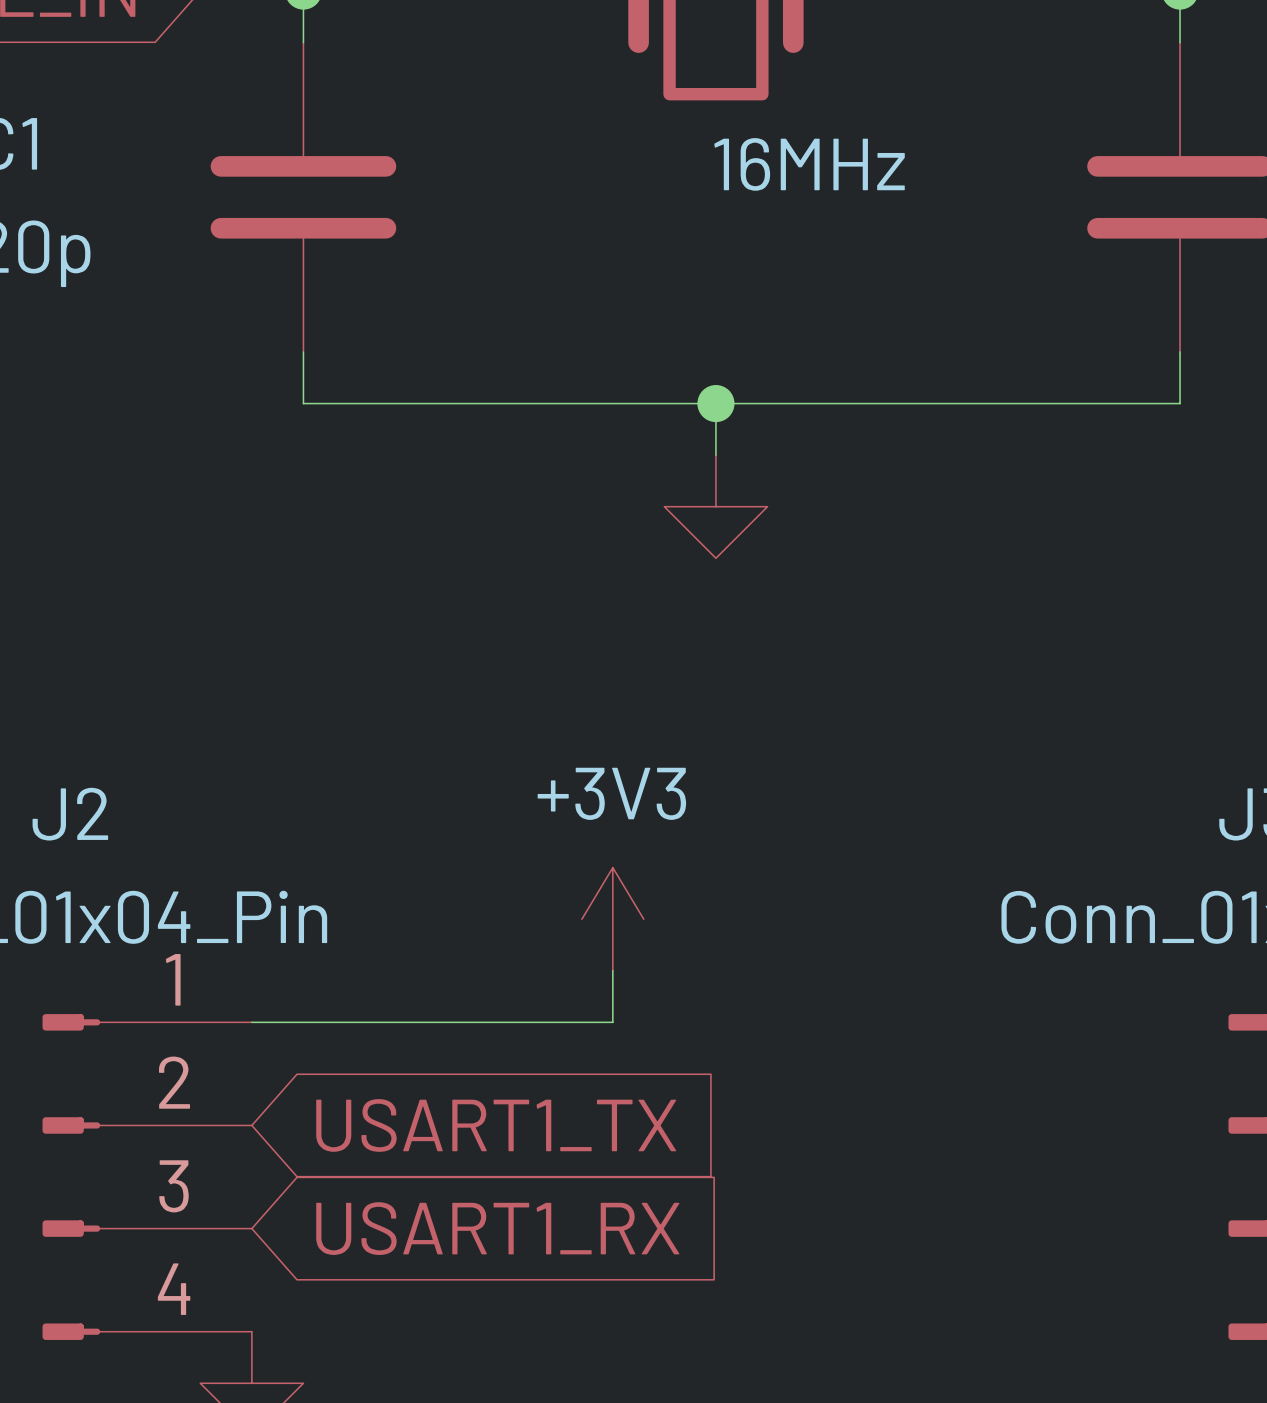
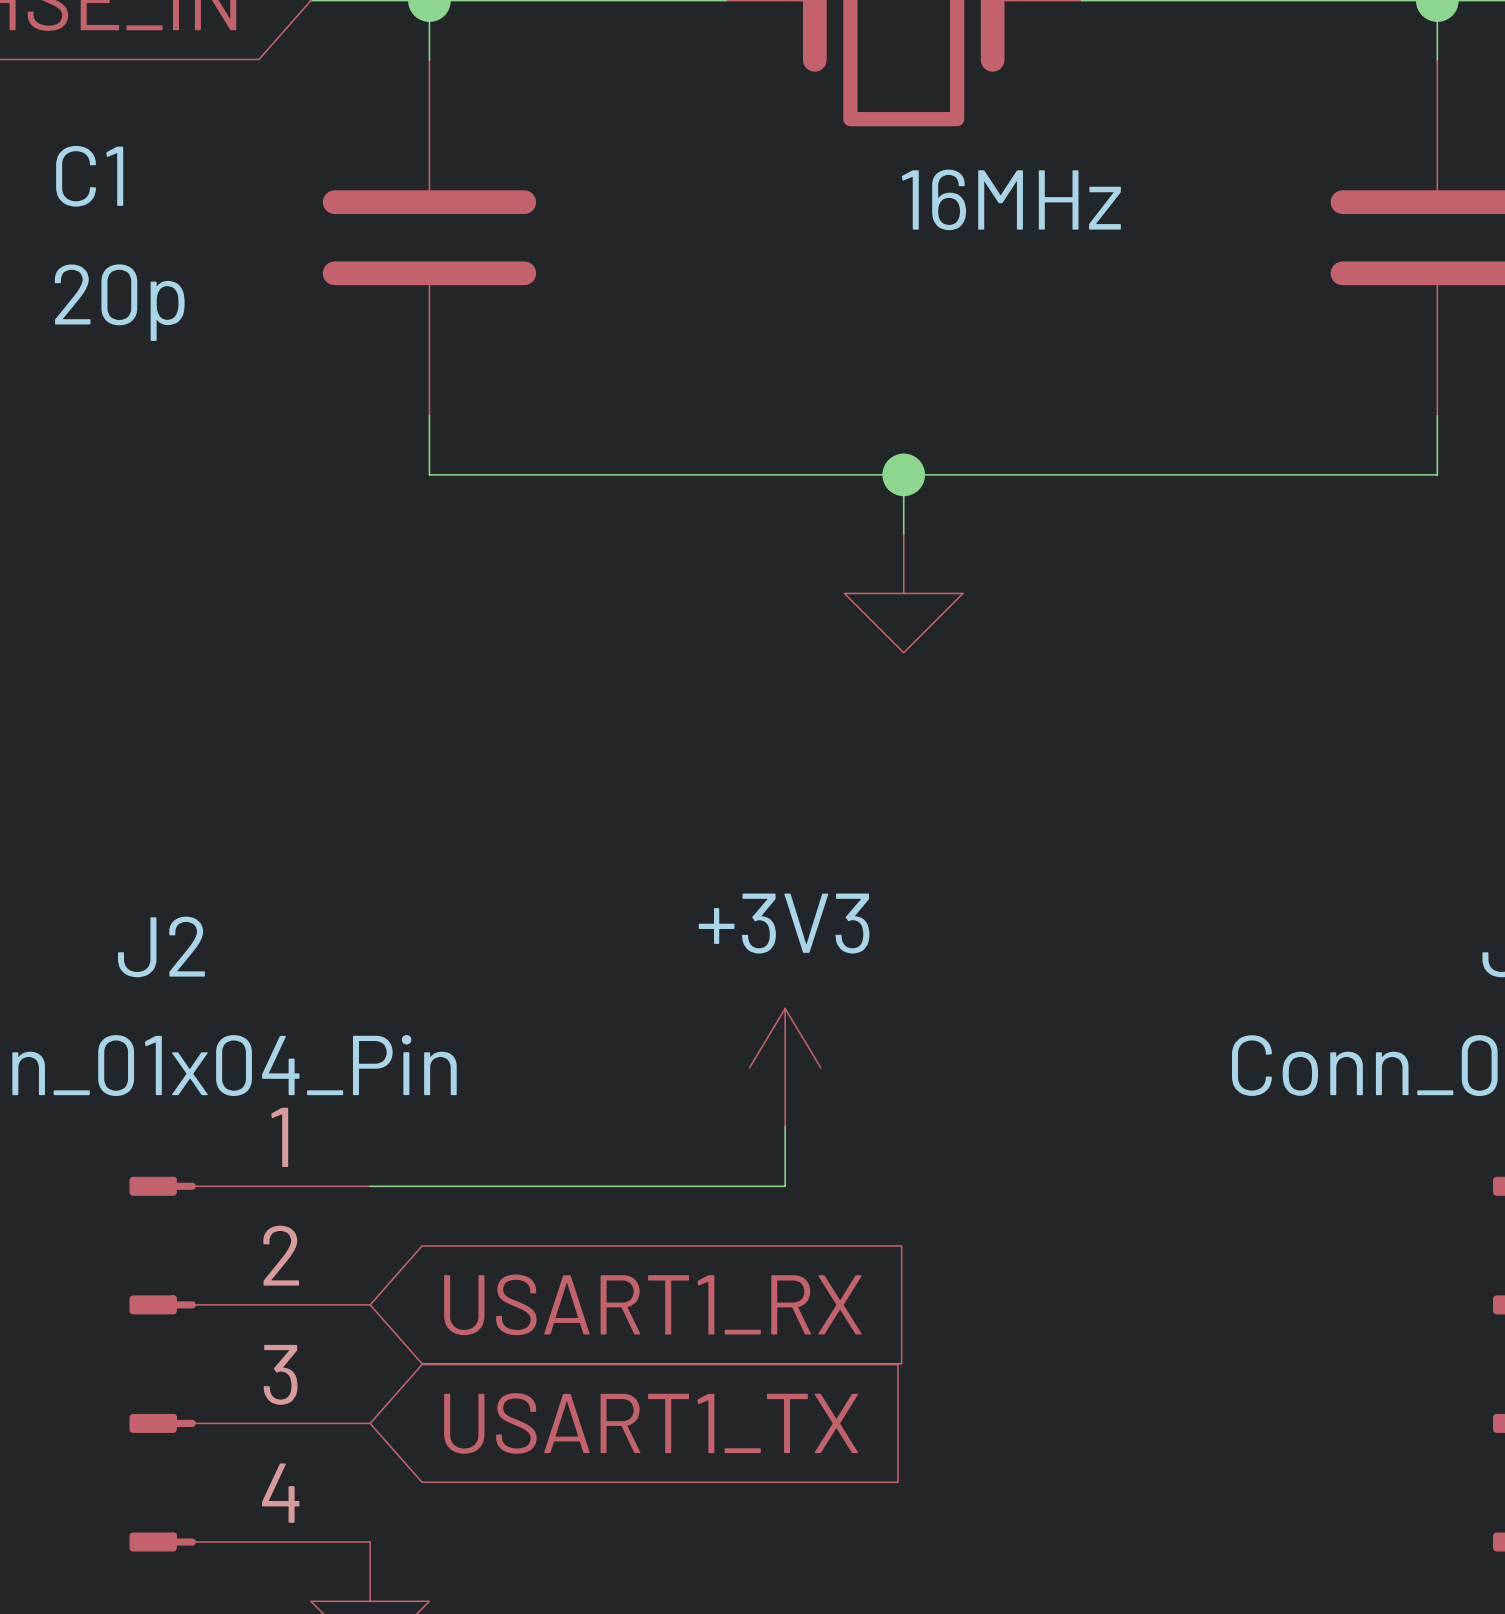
global label: USART1_TX (496, 1125) -> USART1_RX (652, 1304)
global label: USART1_RX (497, 1228) -> USART1_TX (651, 1423)

